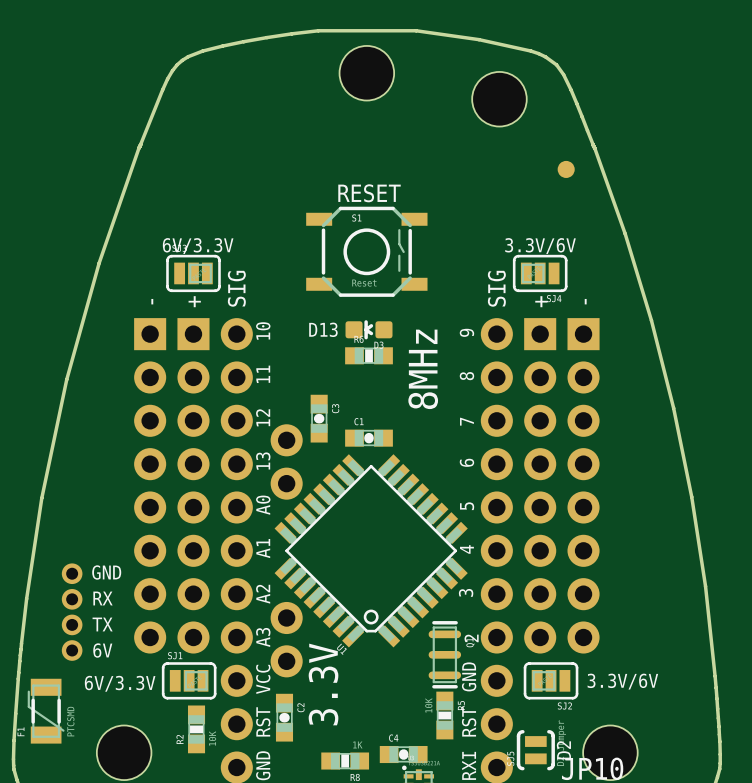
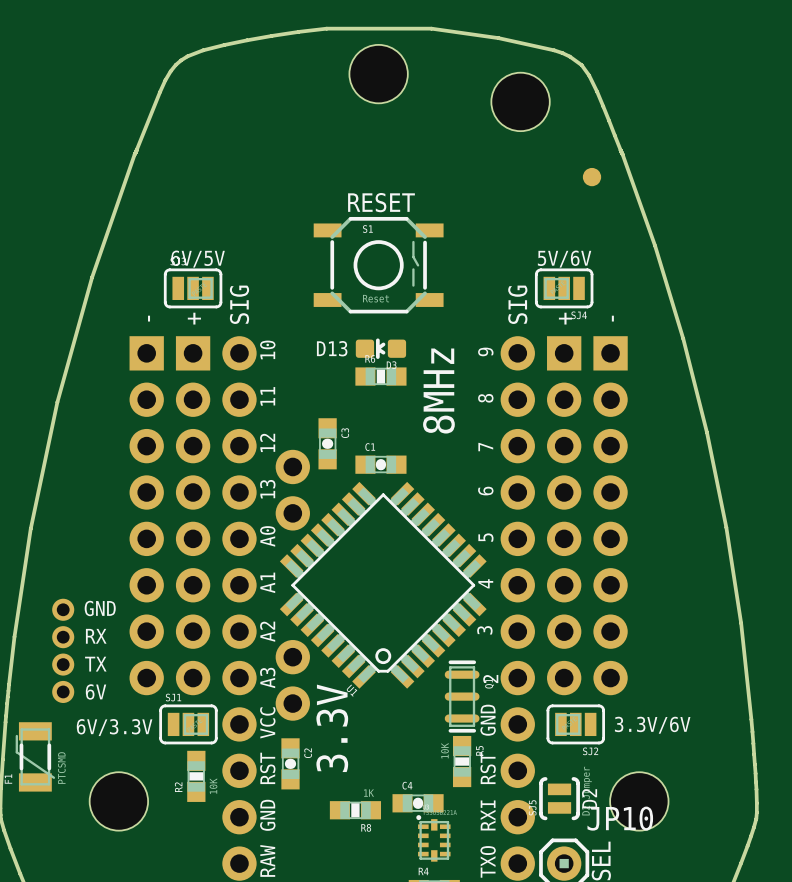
text: 6V/3.3V (198, 246) -> 6V/5V (198, 259)
text: 3.3V/6V (540, 246) -> 5V/6V (564, 259)

